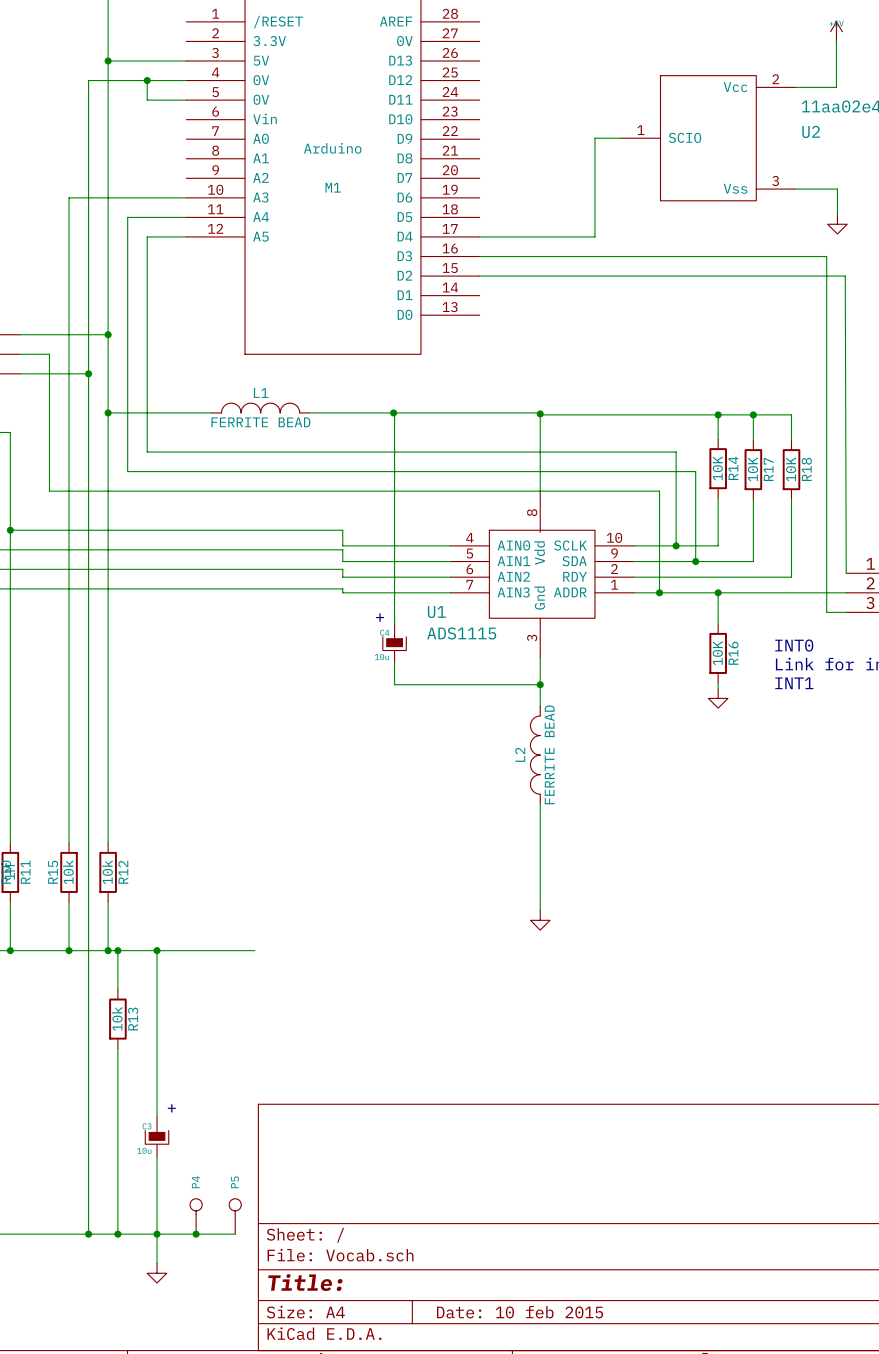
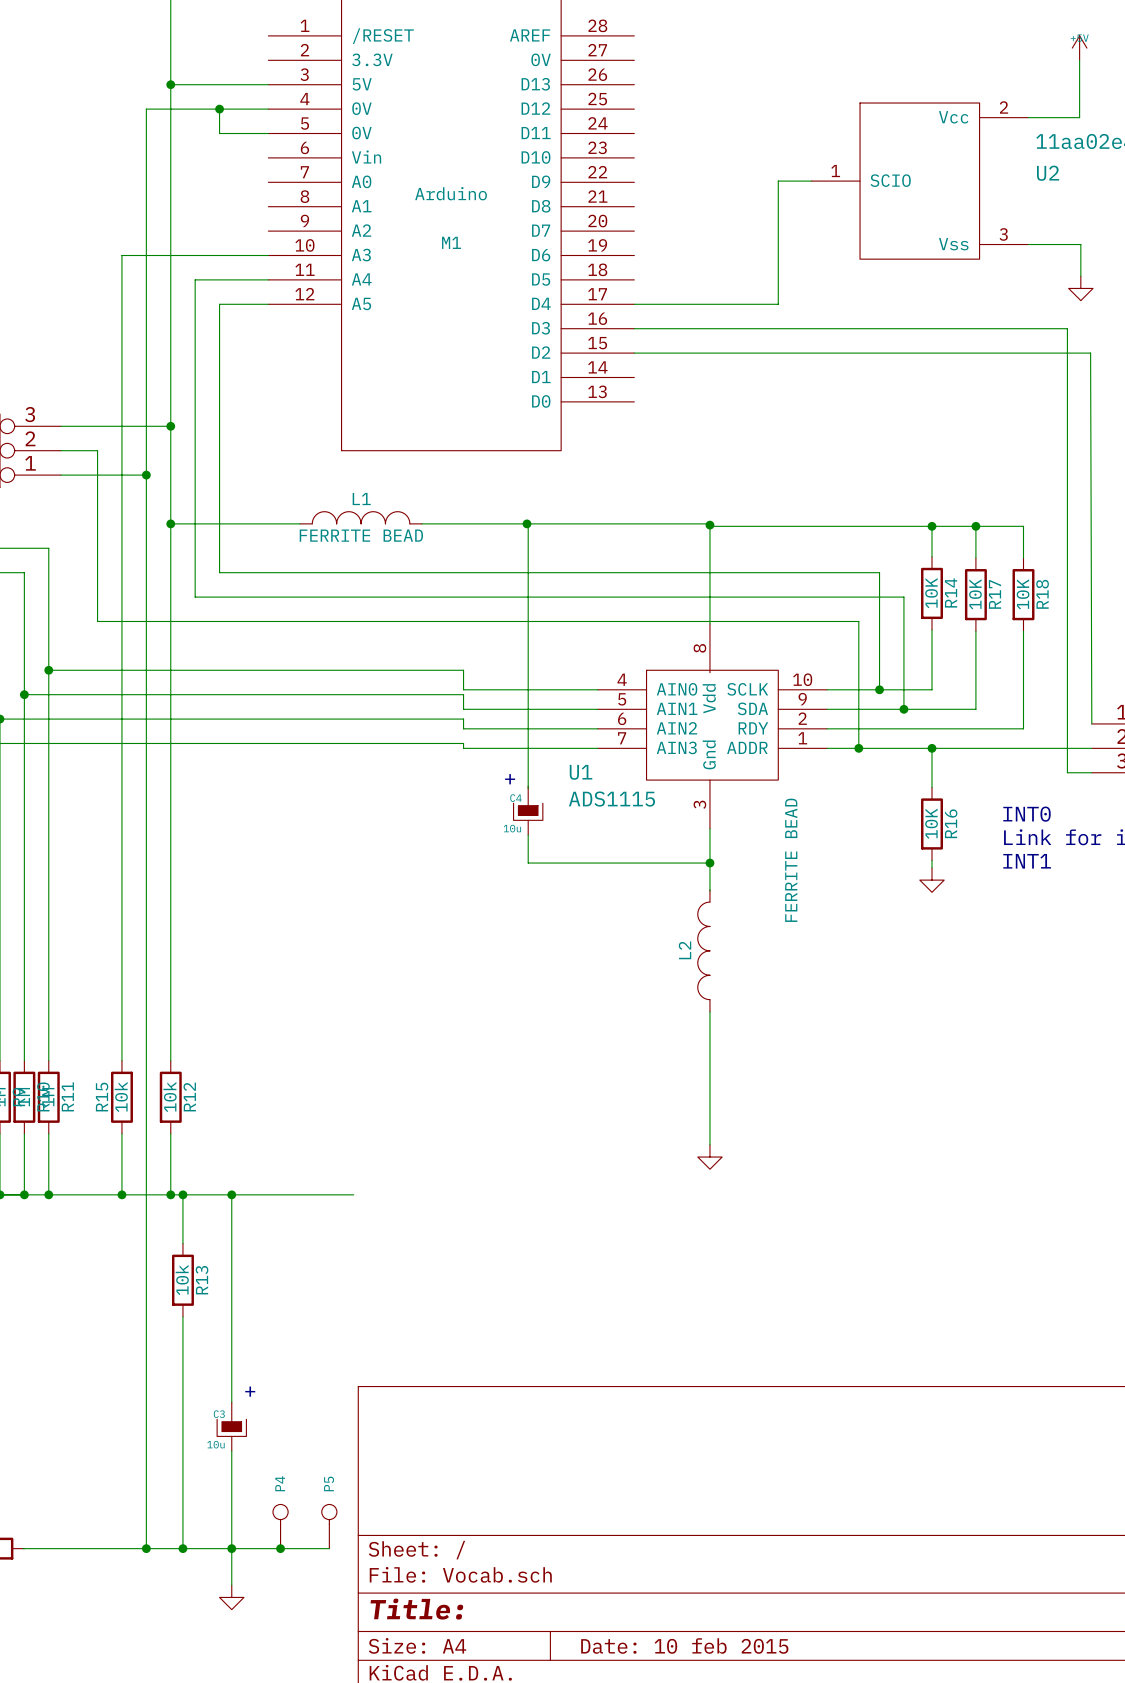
L2 value position: FERRITE BEAD (549, 754) -> FERRITE BEAD (791, 860)

